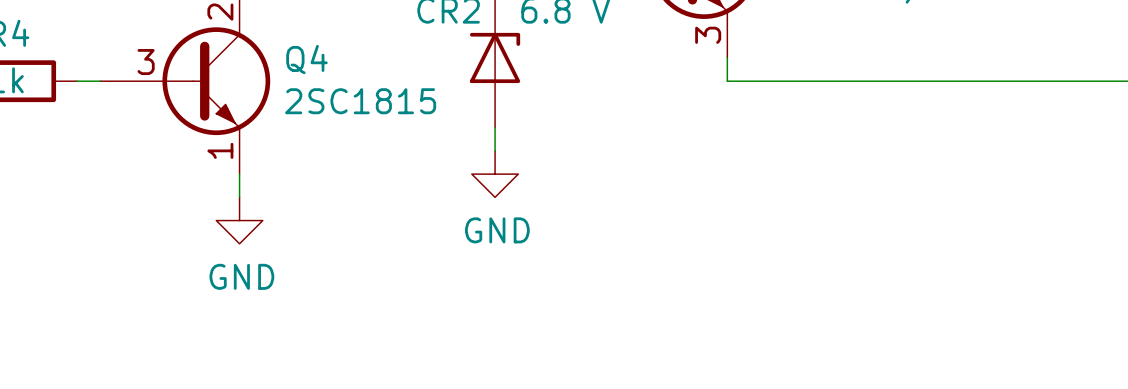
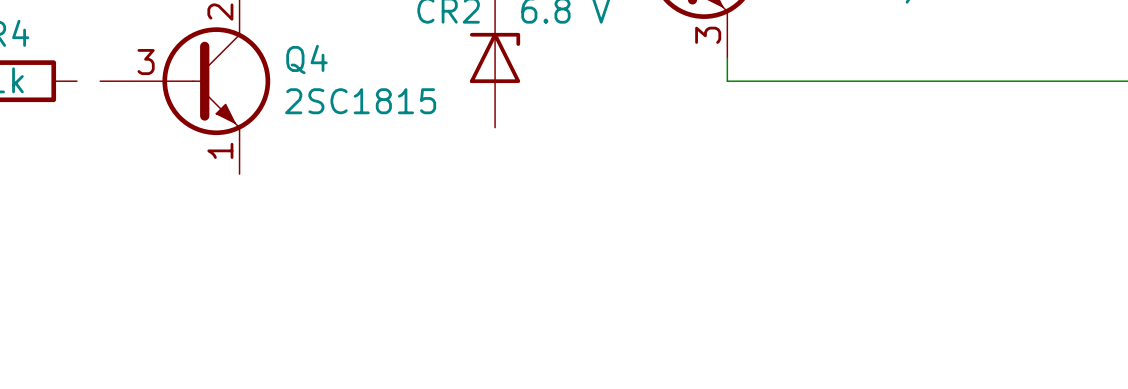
wire: (76, 81) (100, 81) -> none
wire: (495, 127) (495, 150) -> none
wire: (239, 174) (239, 197) -> none
power symbol: GND (495, 174) -> none
power symbol: GND (239, 220) -> none

